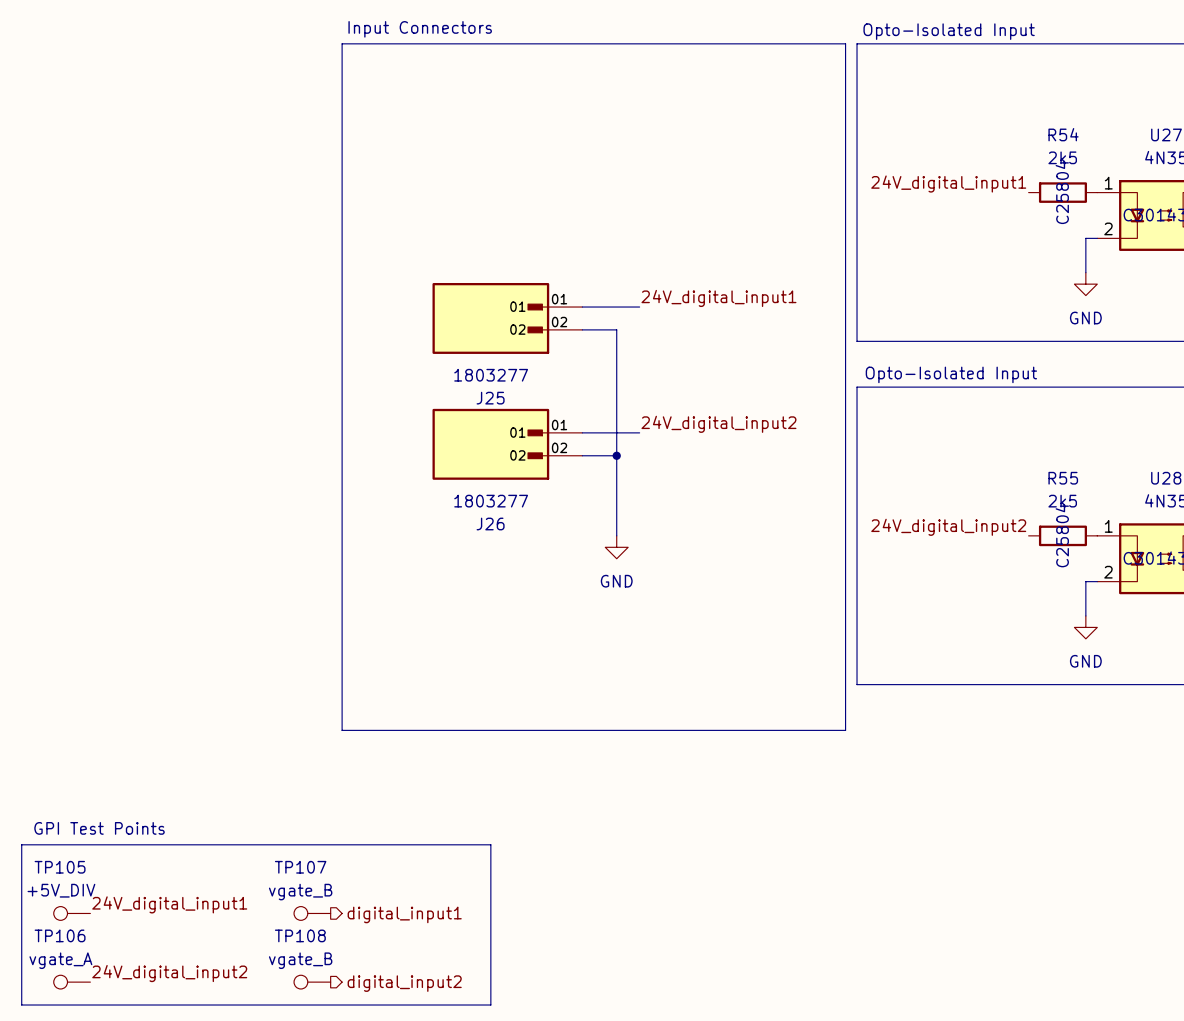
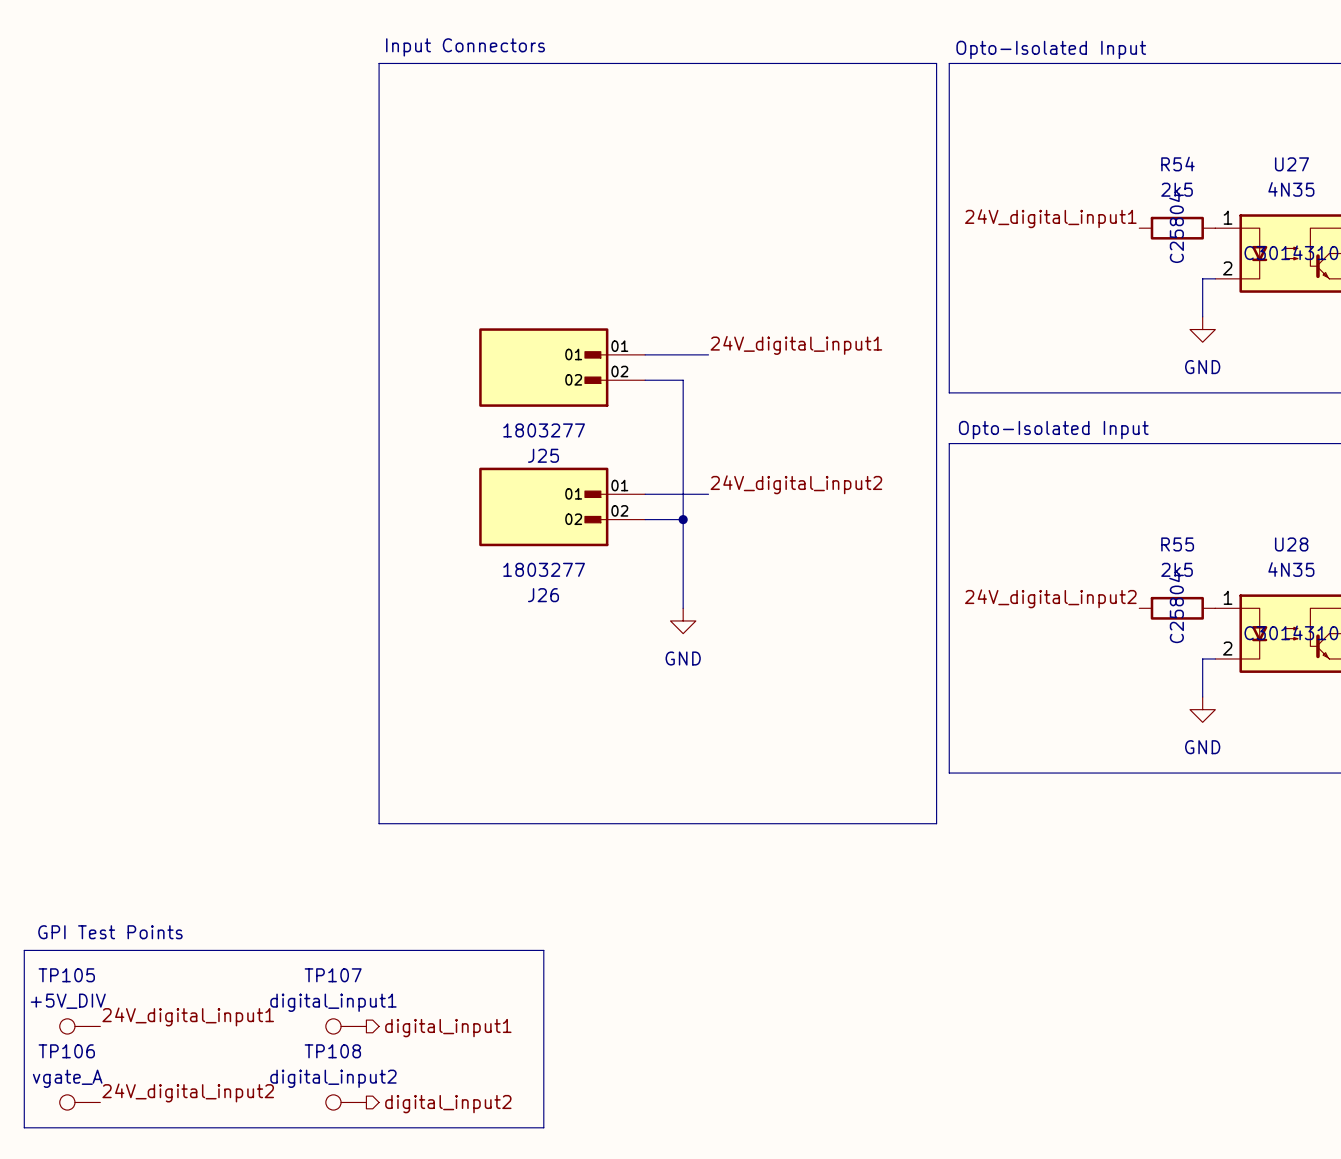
TP107 value: vgate_B (300, 892) -> digital_input1 (333, 1002)
TP108 value: vgate_B (300, 960) -> digital_input2 (333, 1078)

